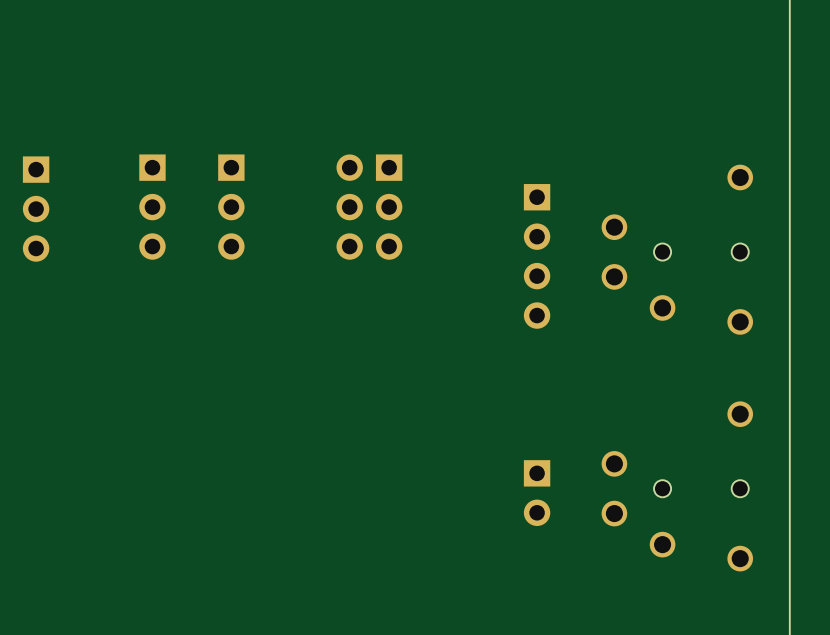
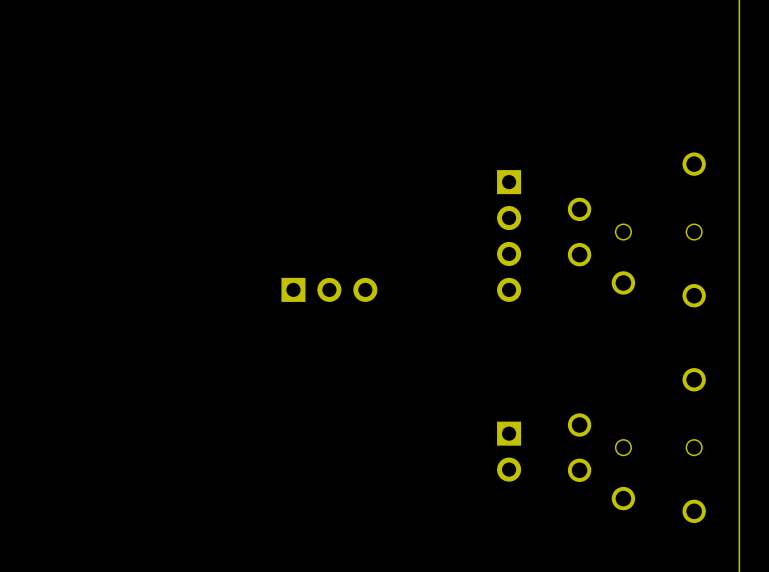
part: (152, 207) -> none
part: (231, 207) -> none
part: (369, 207) -> none
part: (36, 209) -> none
part: none -> (329, 289)

